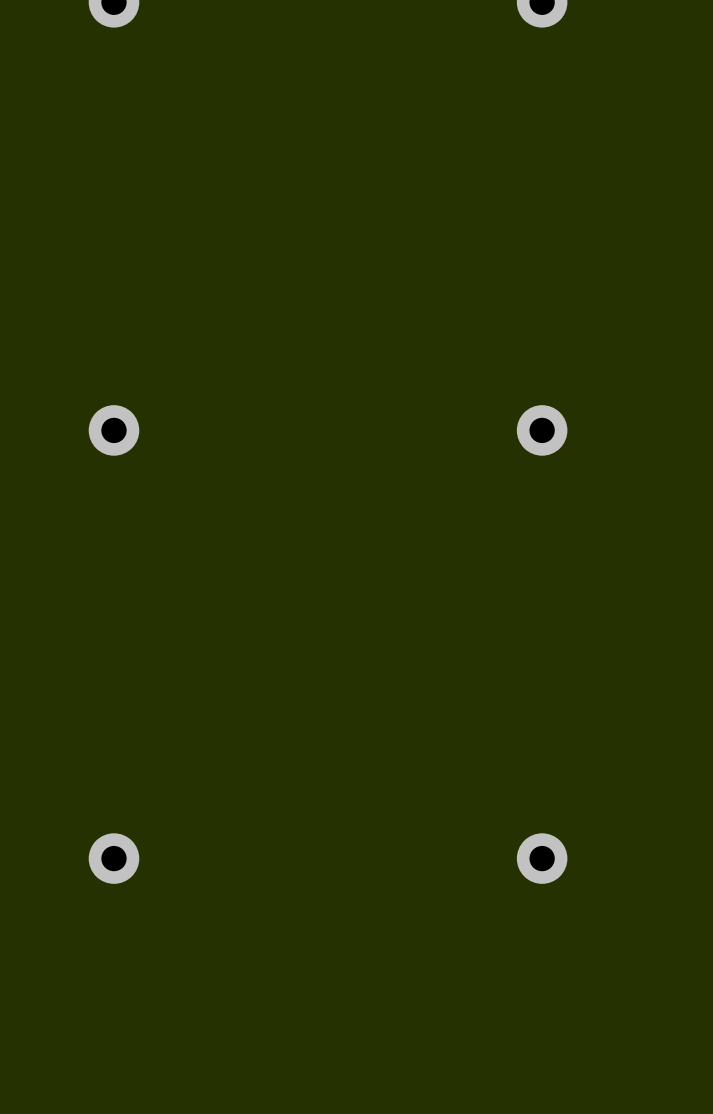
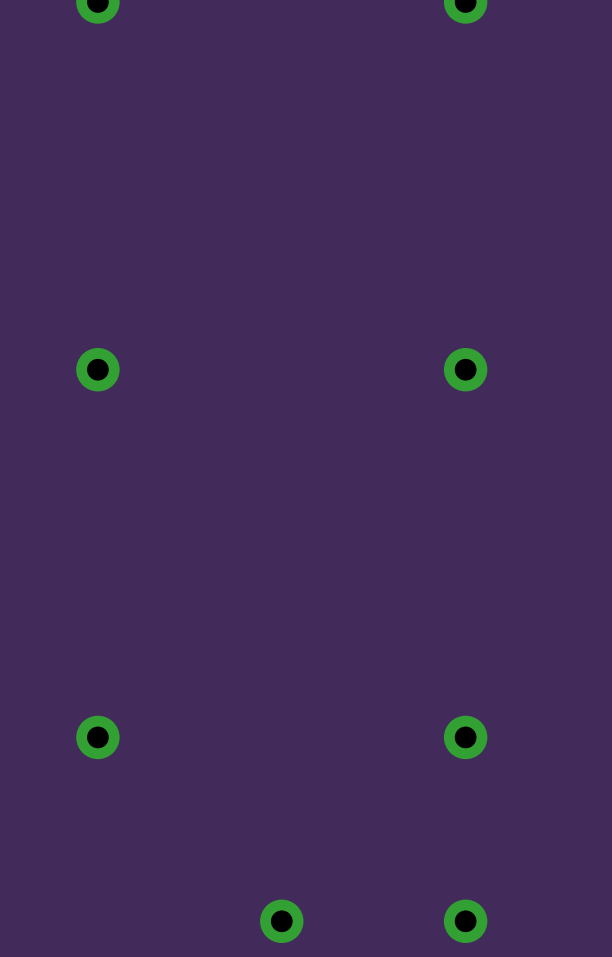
via: none -> (281, 921)
via: none -> (465, 921)

